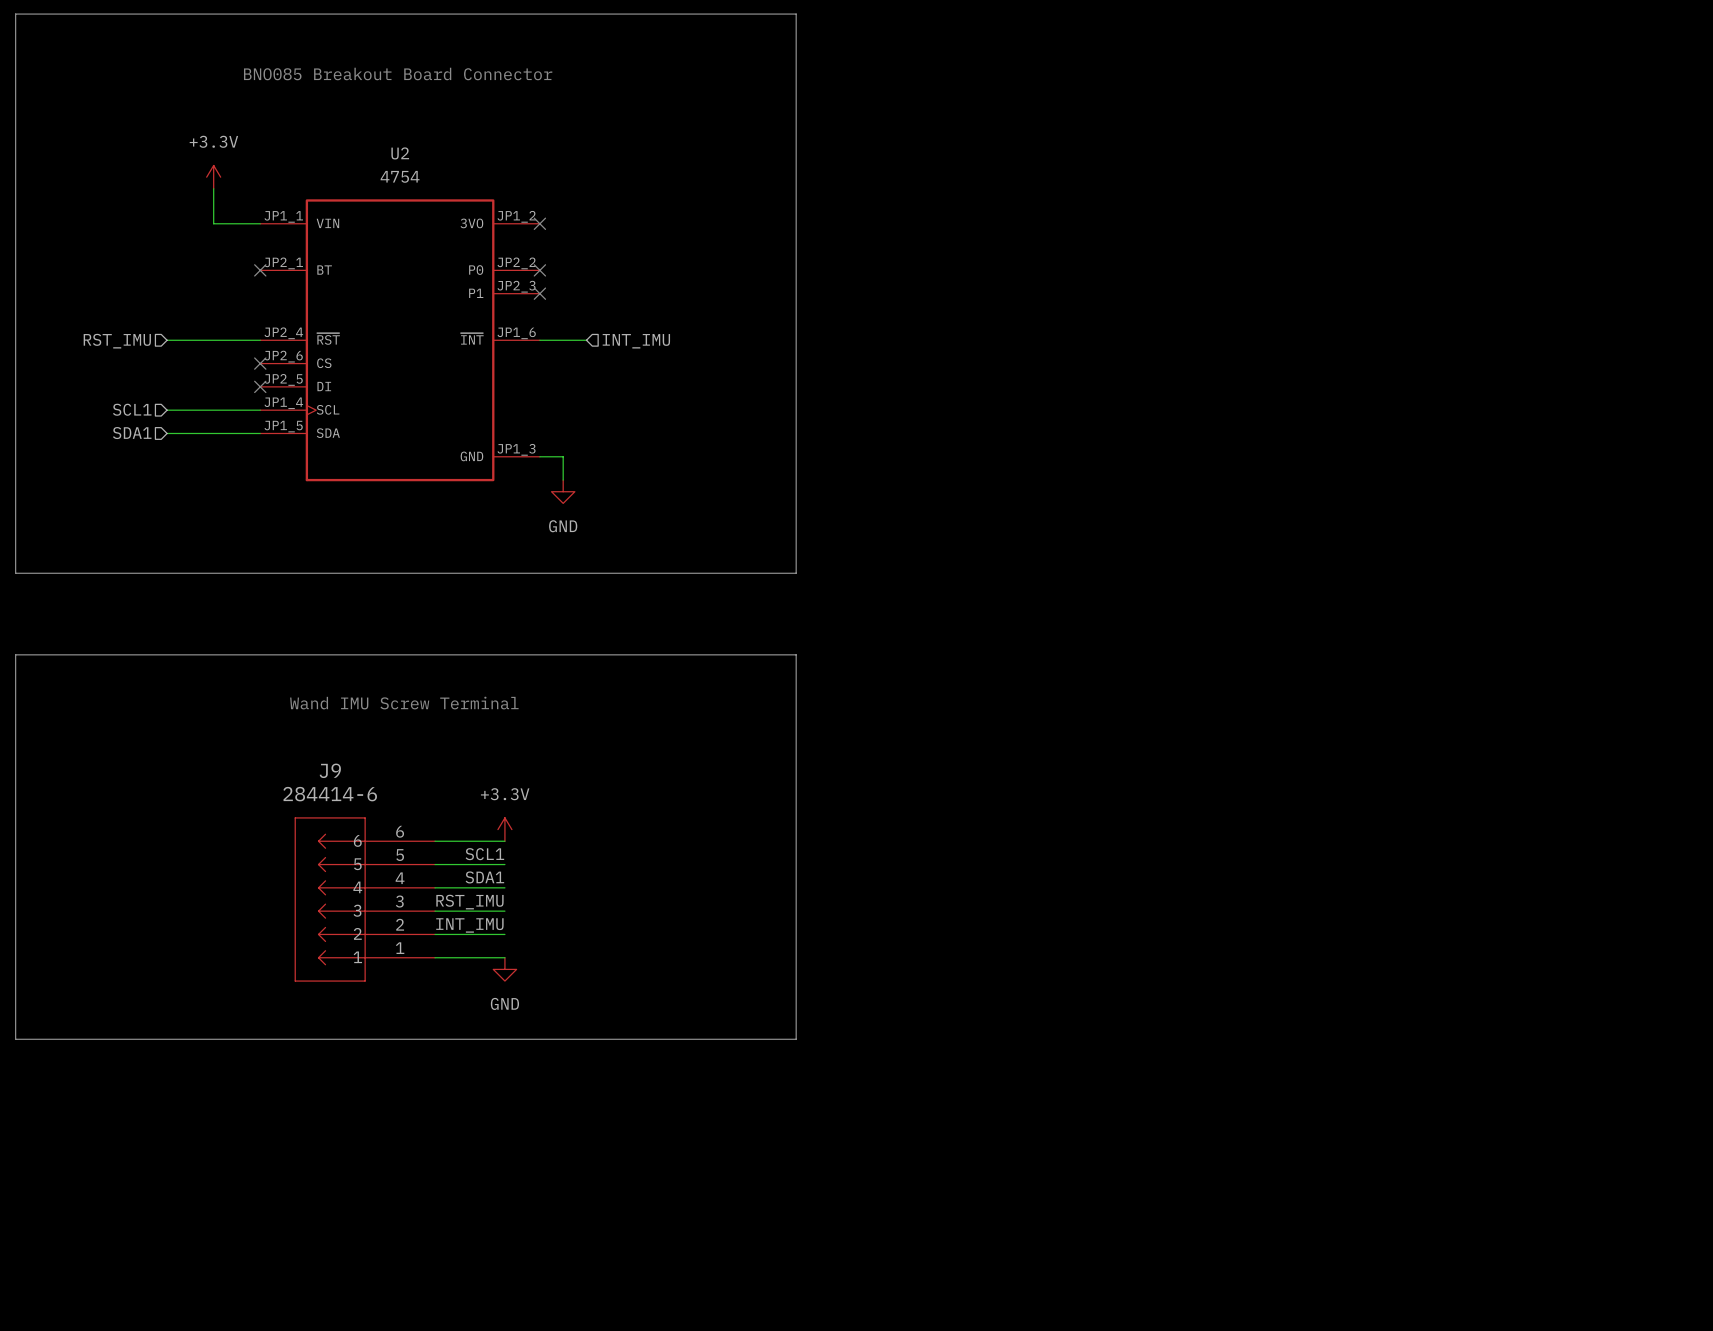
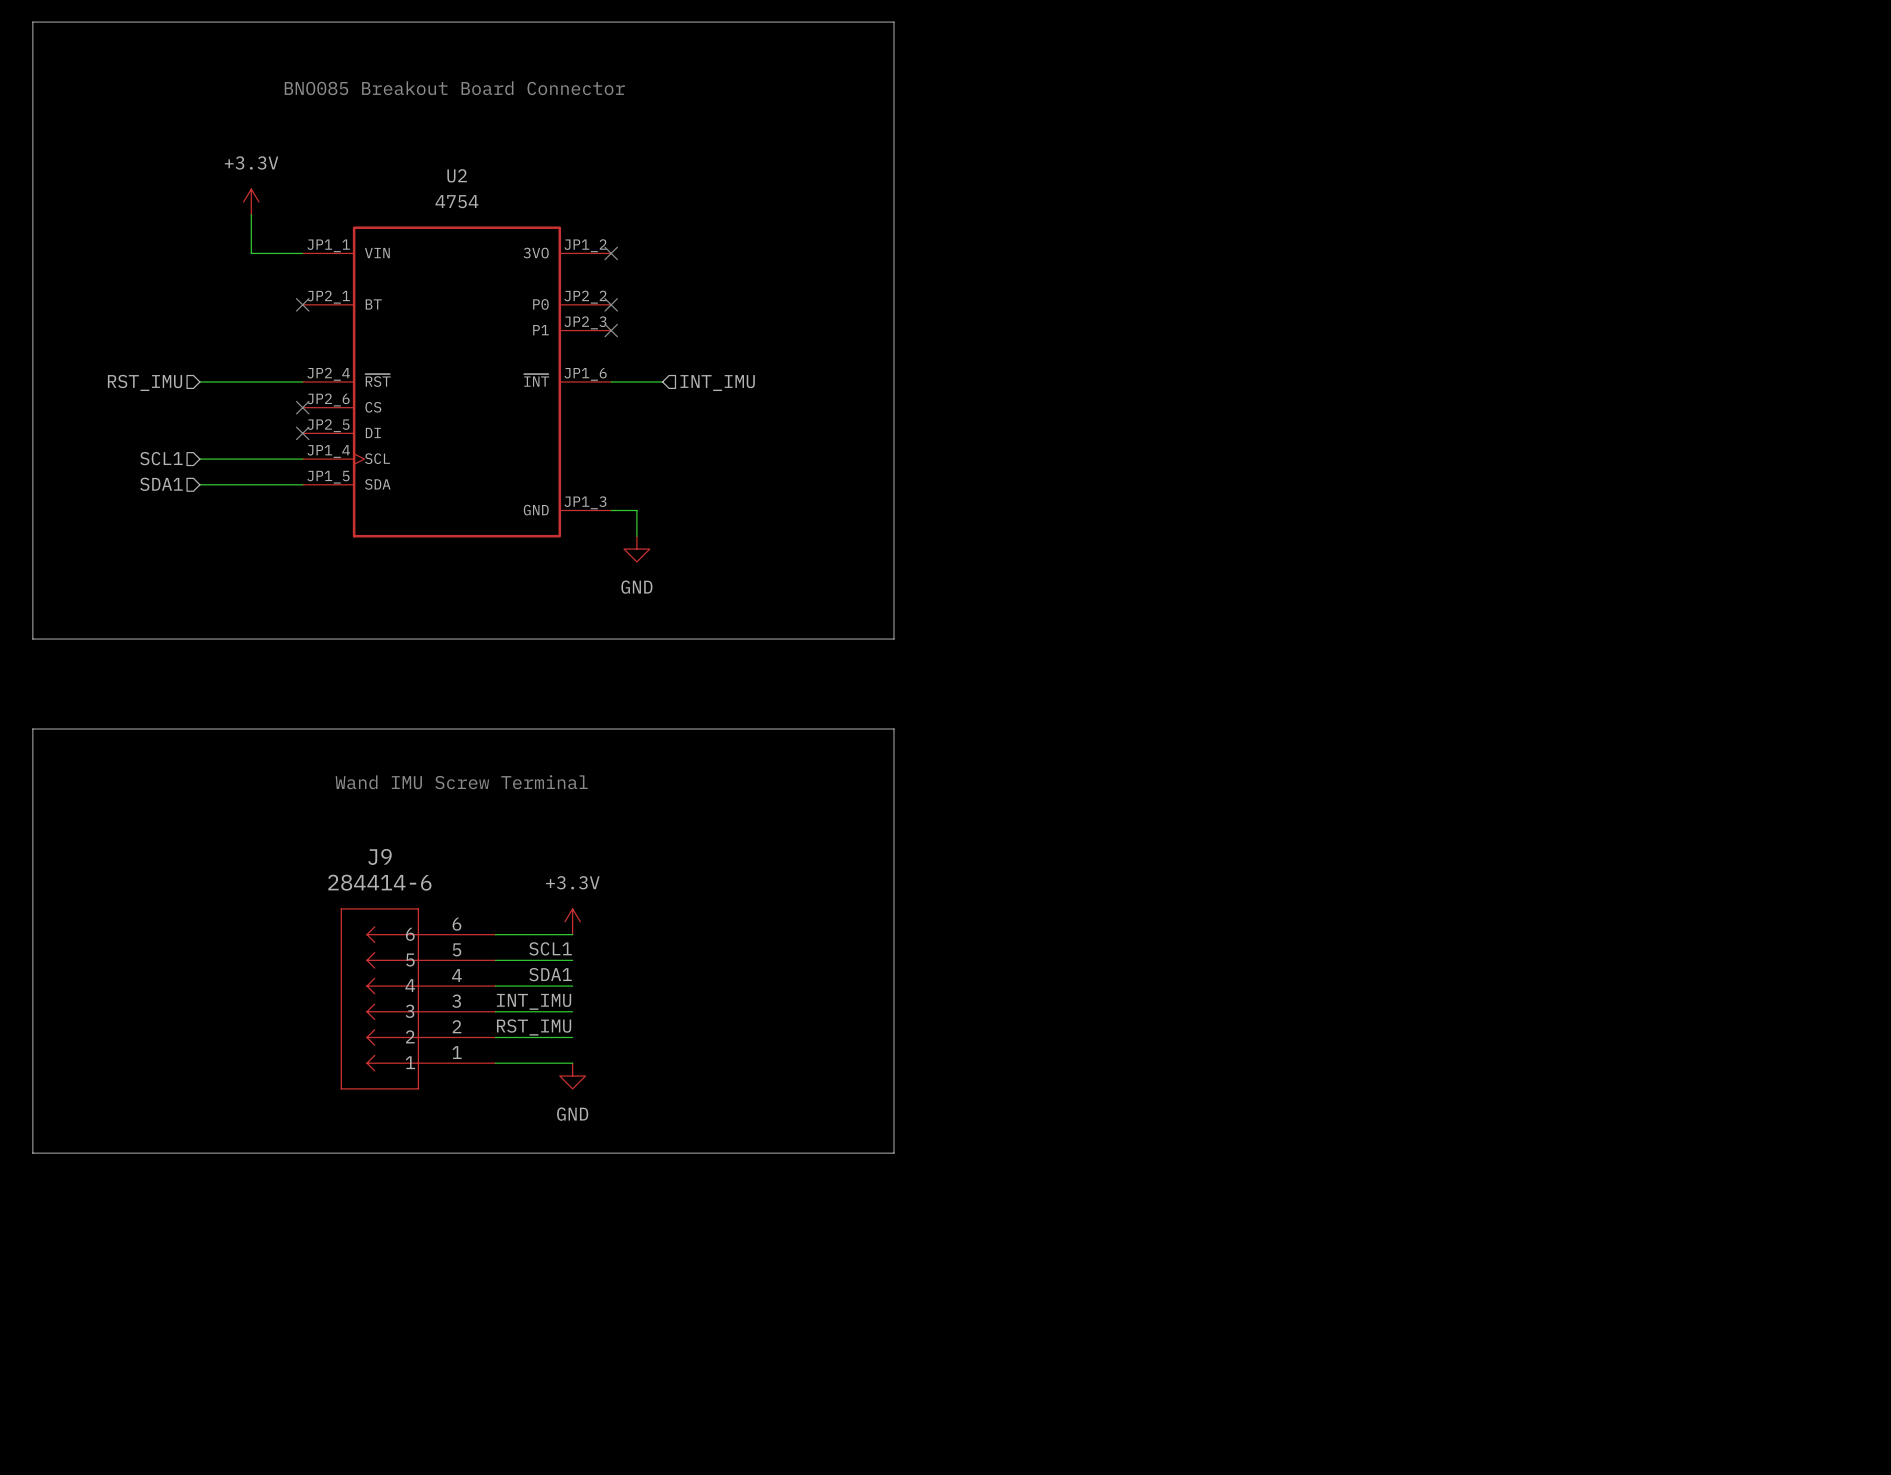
label: RST_IMU (469, 902) -> INT_IMU (534, 1001)
label: INT_IMU (469, 925) -> RST_IMU (534, 1027)

